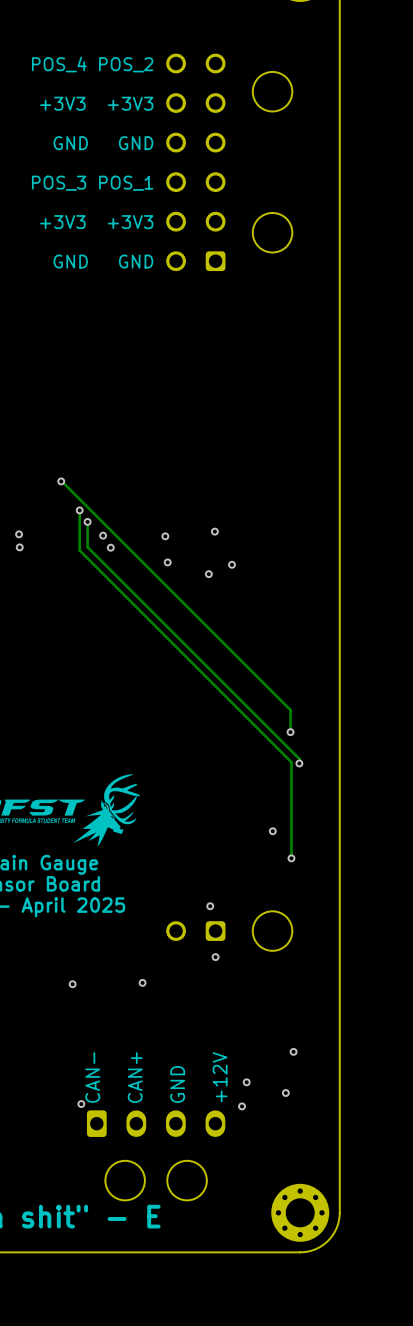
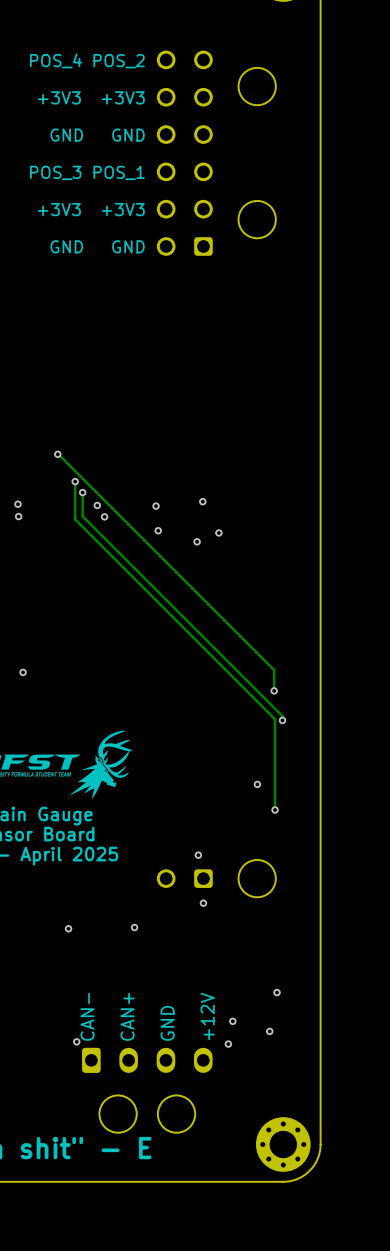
via: none -> (23, 672)

